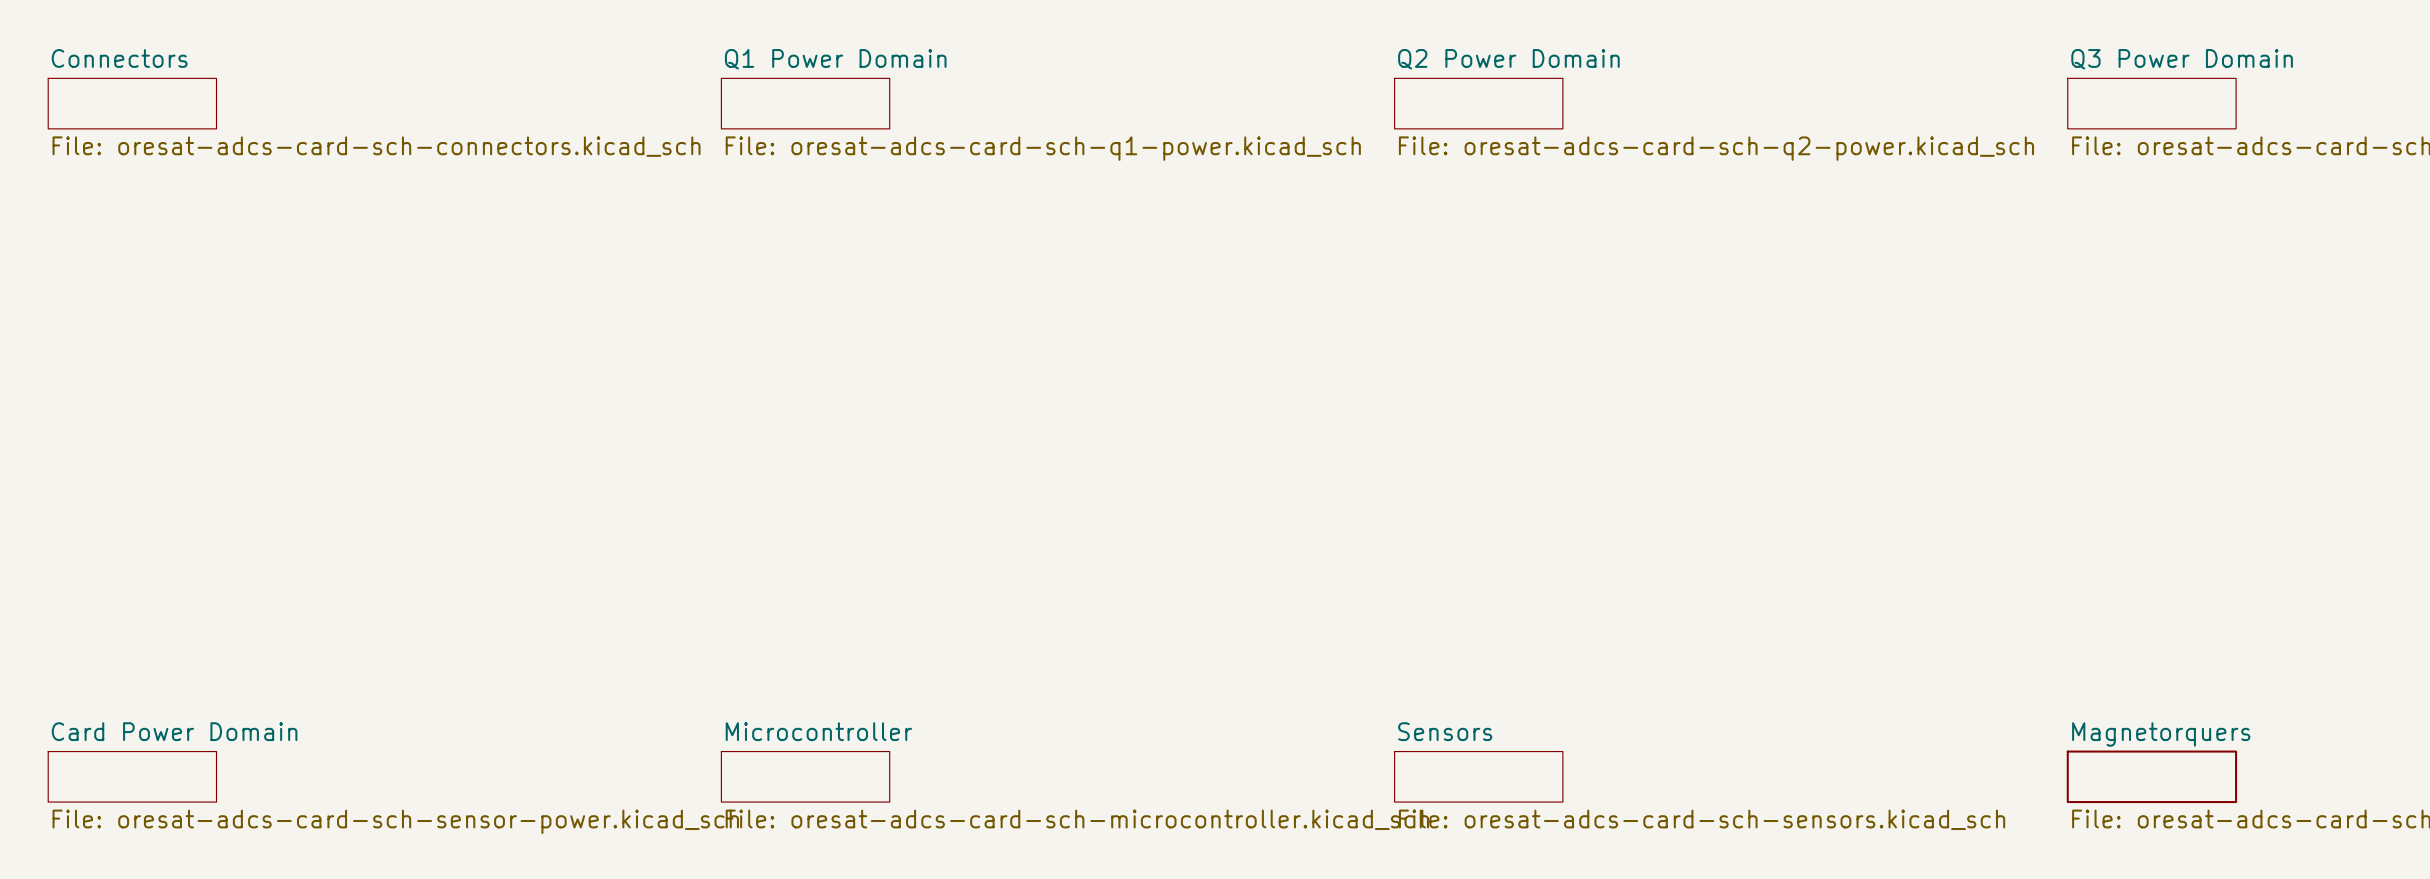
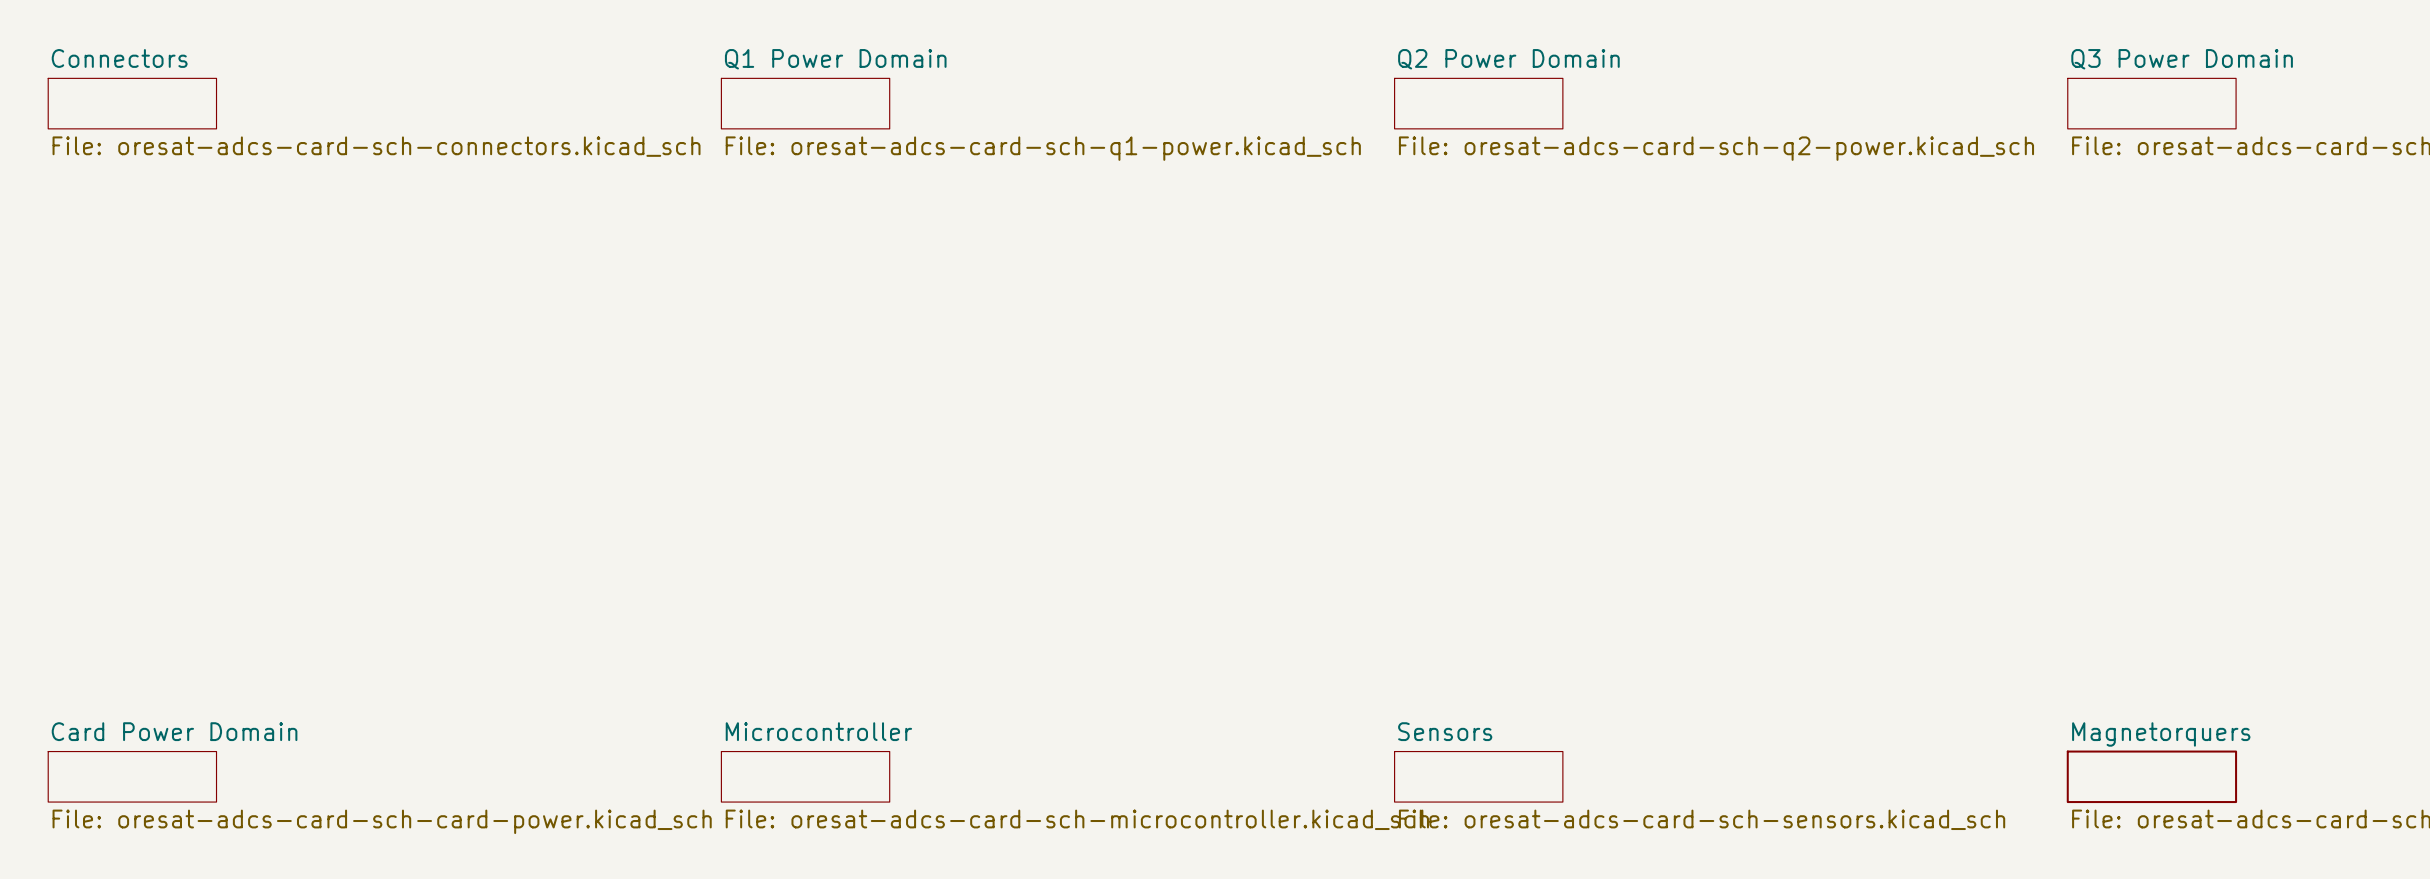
sheet Card Power Domain value: File: oresat-adcs-card-sch-sensor-power.kicad_sch (395, 821) -> File: oresat-adcs-card-sch-card-power.kicad_sch (382, 821)

